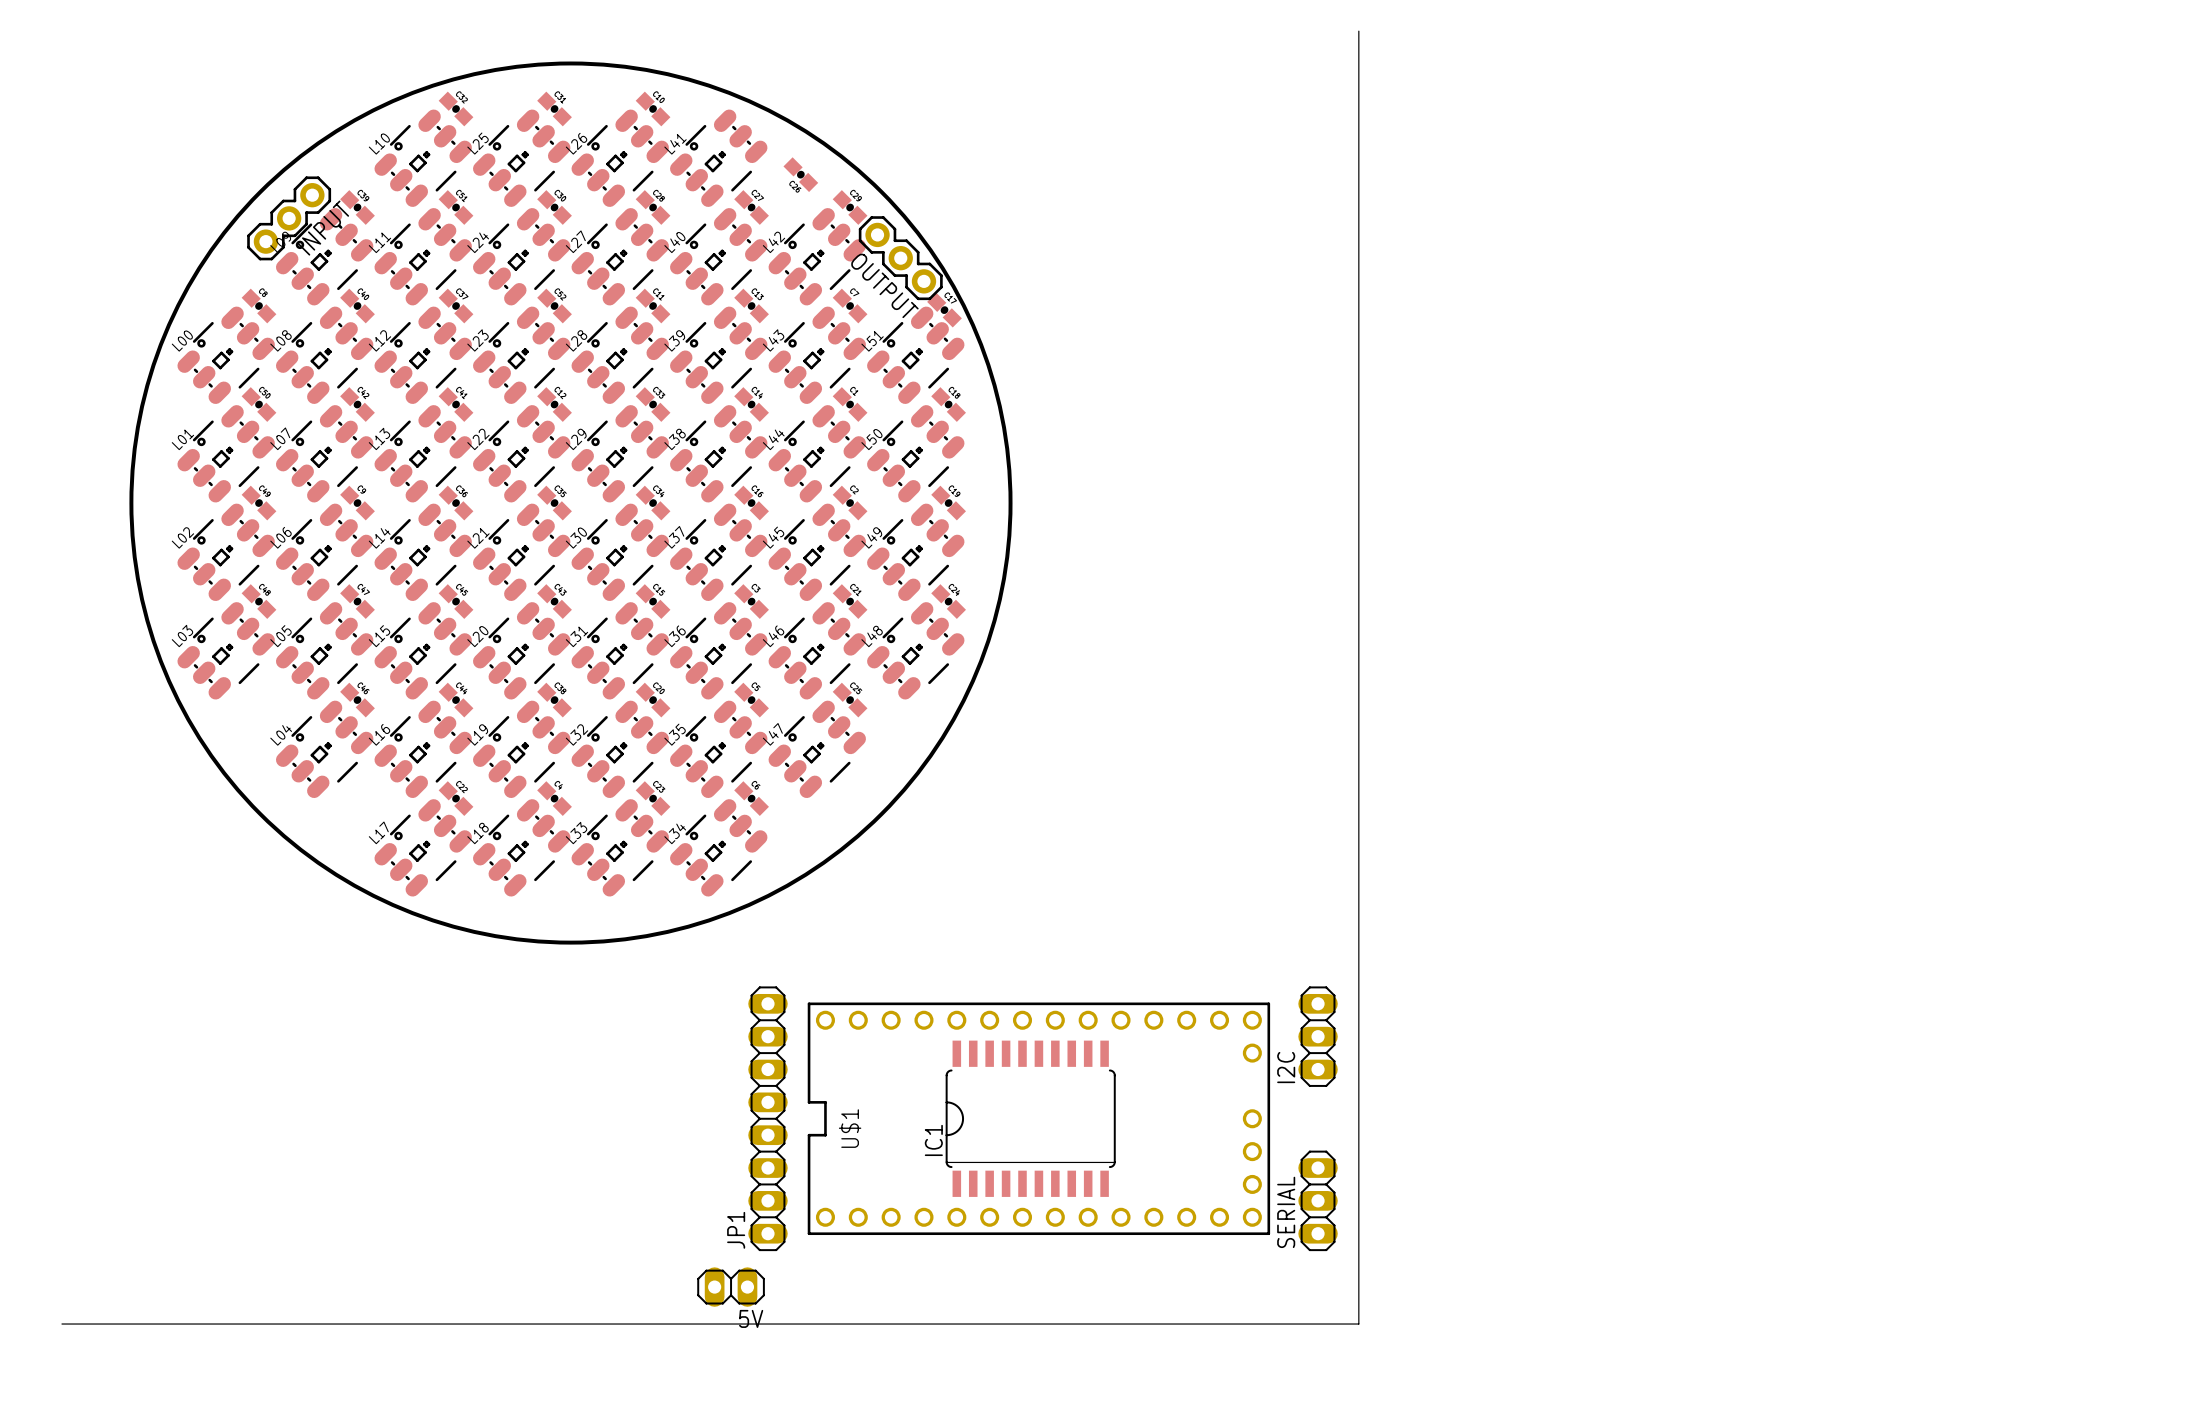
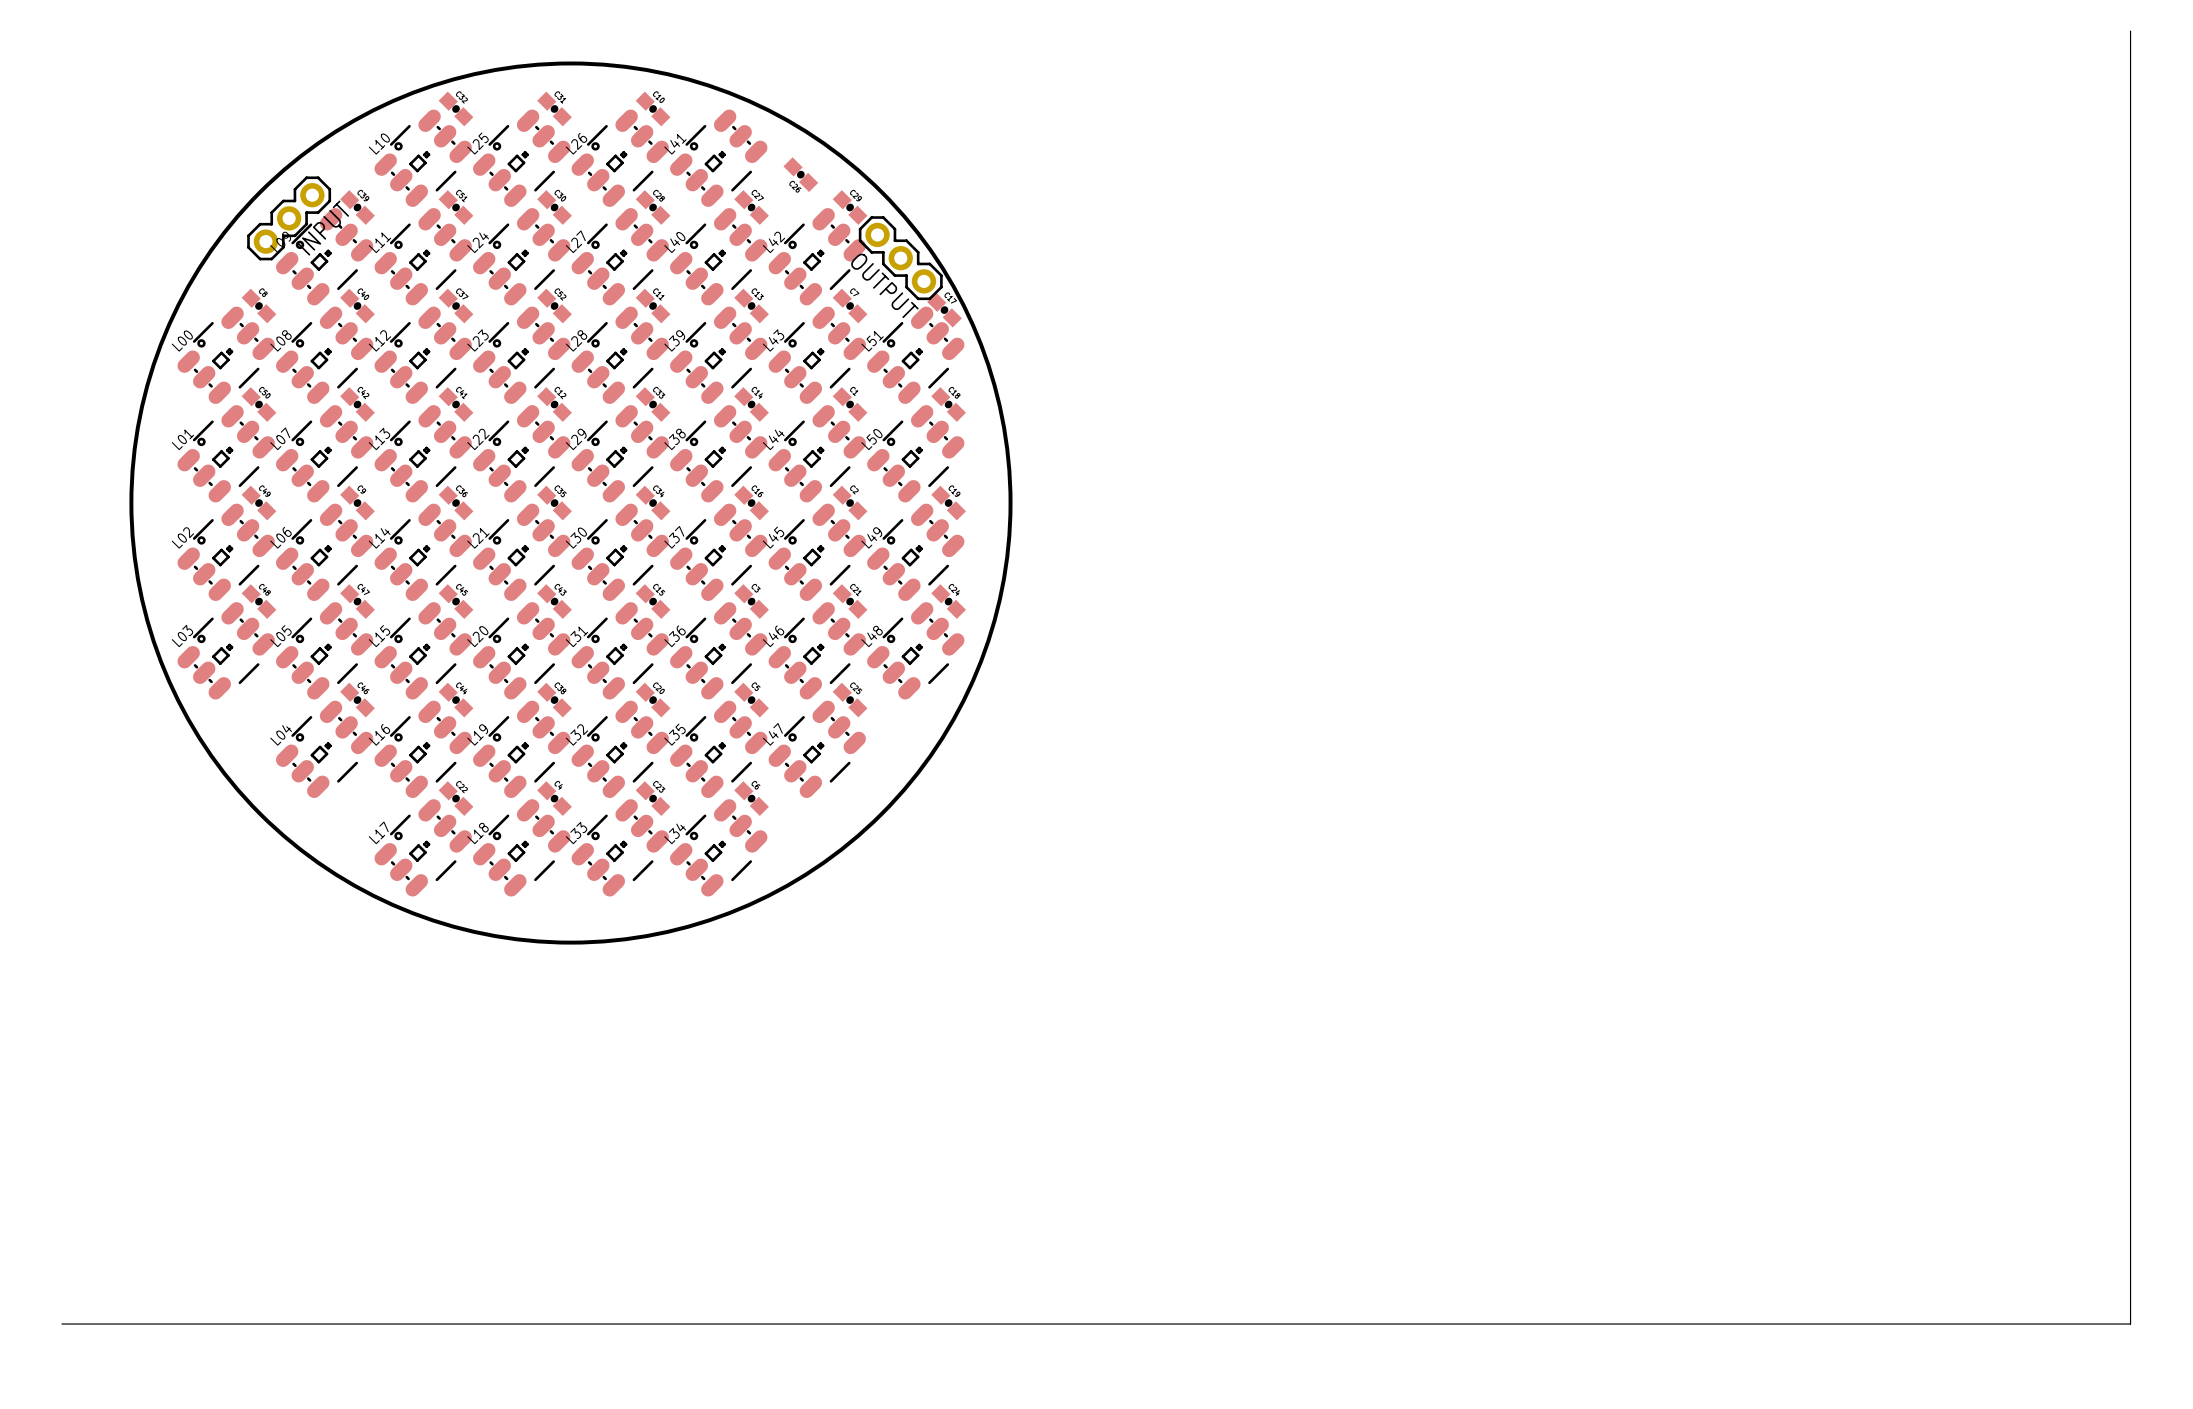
board edge: (1358, 31) (1358, 1324) -> (2130, 31) (2130, 1324) (1358, 1324)
I2C: (1318, 1036) -> none
JP1: (768, 1118) -> none
IC1: (1030, 1118) -> none
U$1: (1038, 1118) -> none
SERIAL: (1318, 1200) -> none
5V: (731, 1287) -> none

